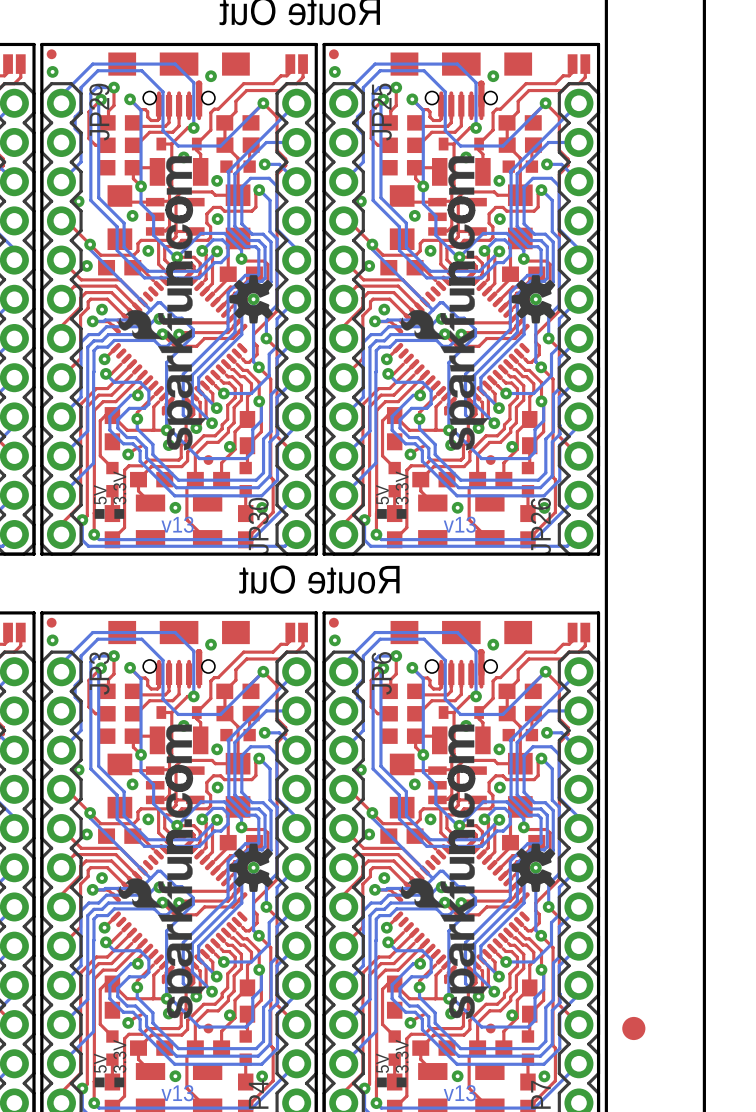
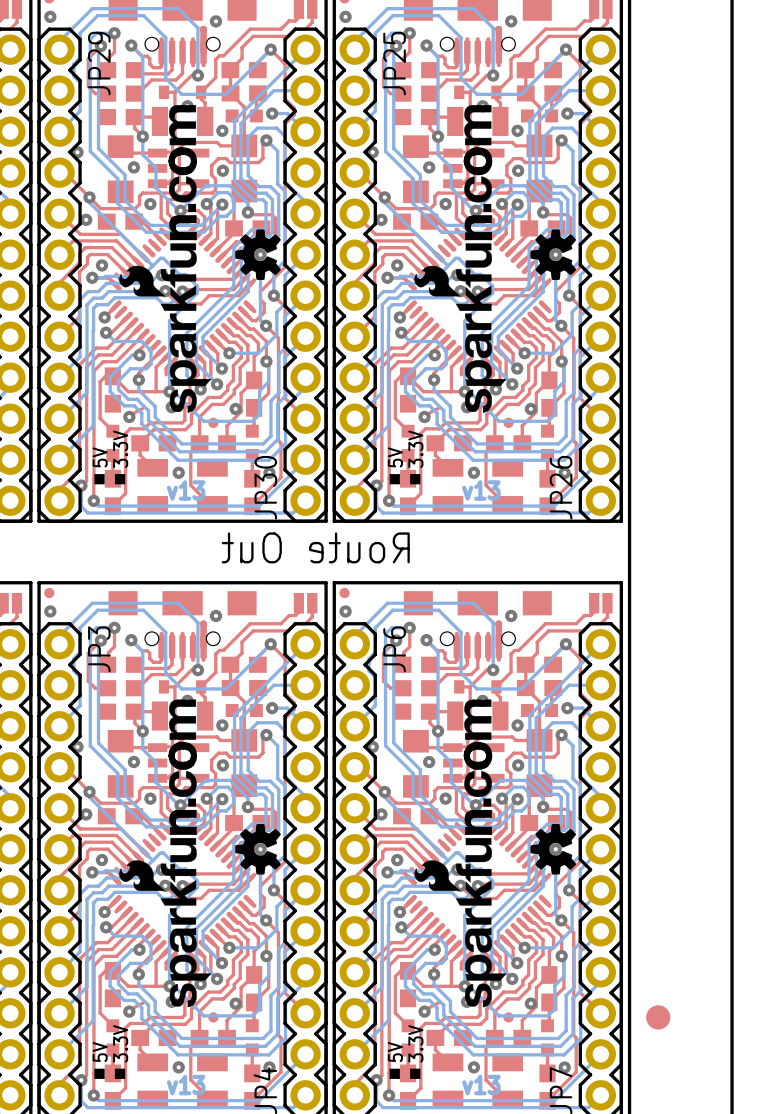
part footprint: [110, 270, 248, 407] -> [108, 221, 257, 370]
part footprint: [392, 270, 530, 407] -> [403, 221, 552, 370]
part footprint: [110, 838, 248, 976] -> [108, 816, 257, 965]
part footprint: [392, 838, 530, 976] -> [403, 816, 552, 965]

